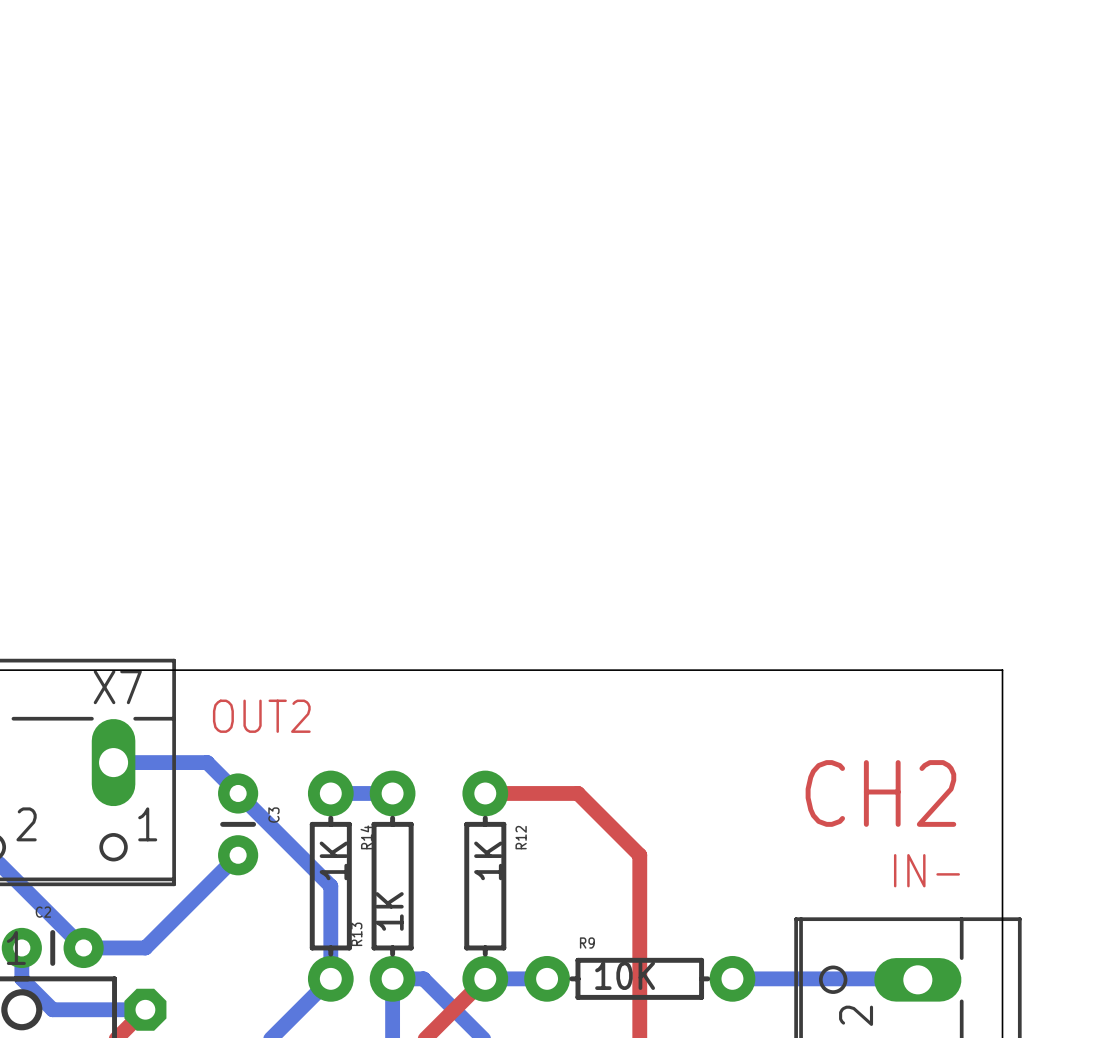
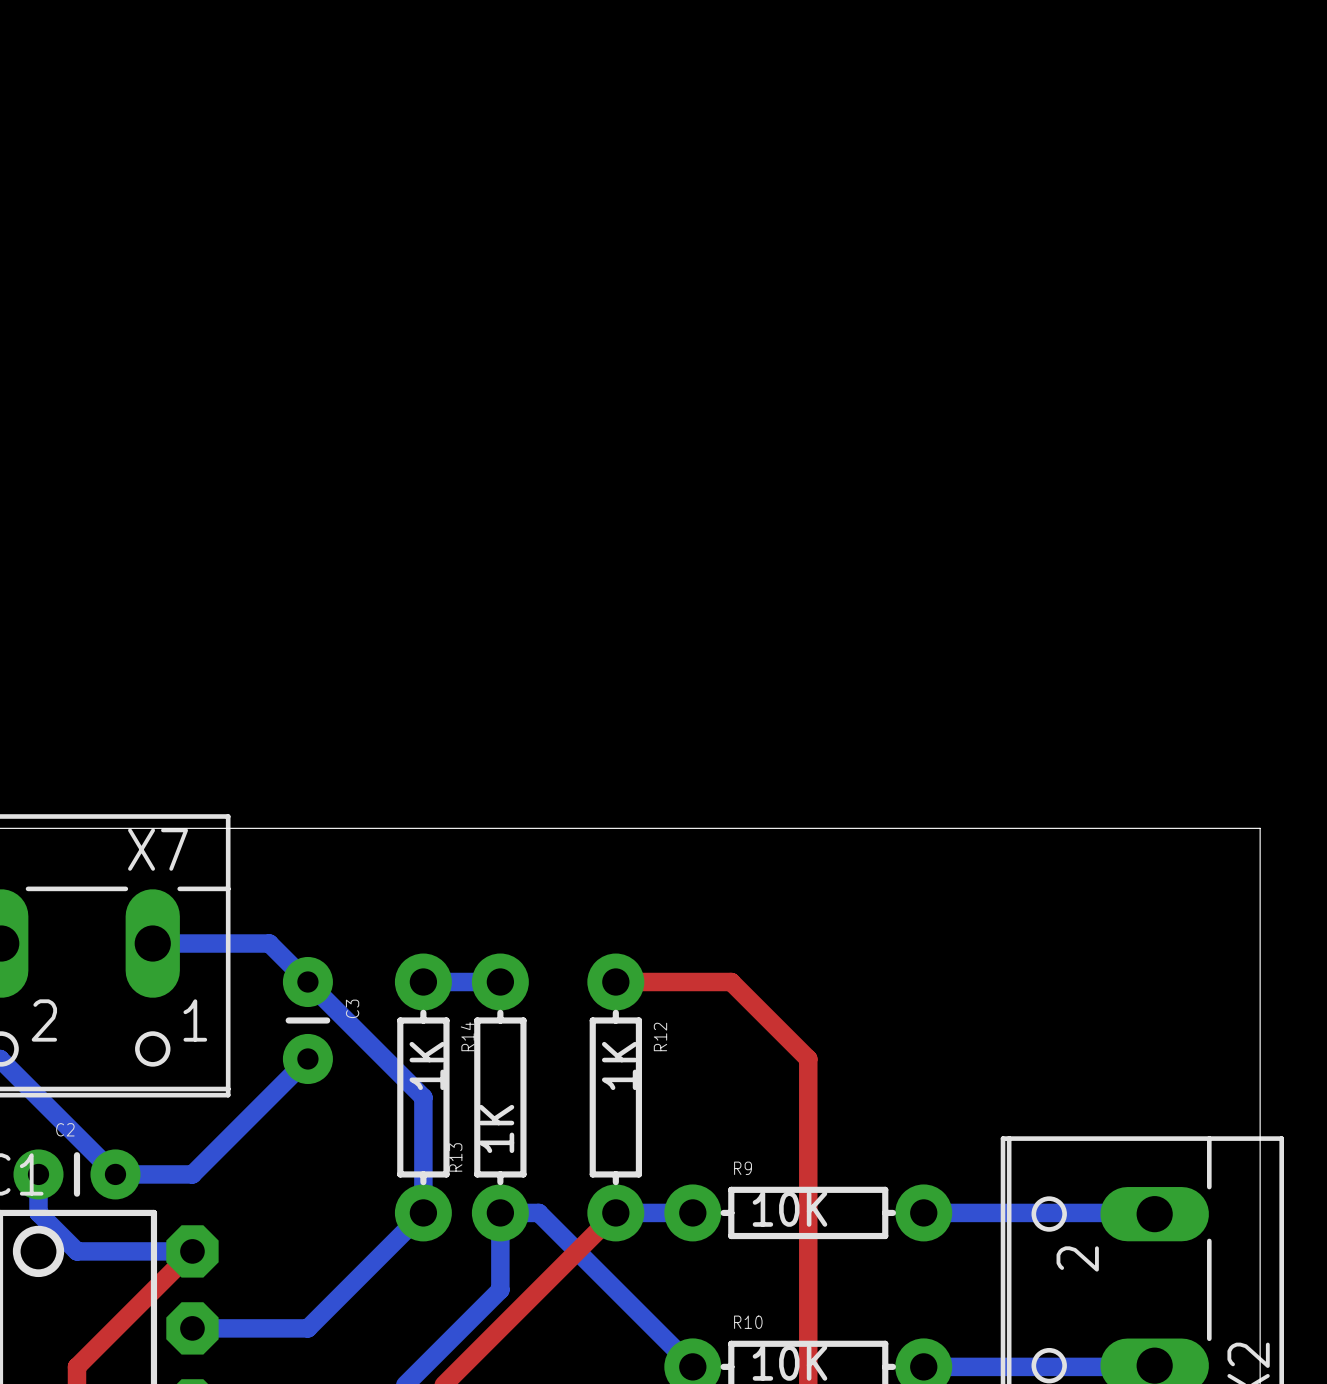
text: OUT2 (261, 716) -> none
text: CH2 (880, 793) -> none
text: IN- (926, 870) -> none

